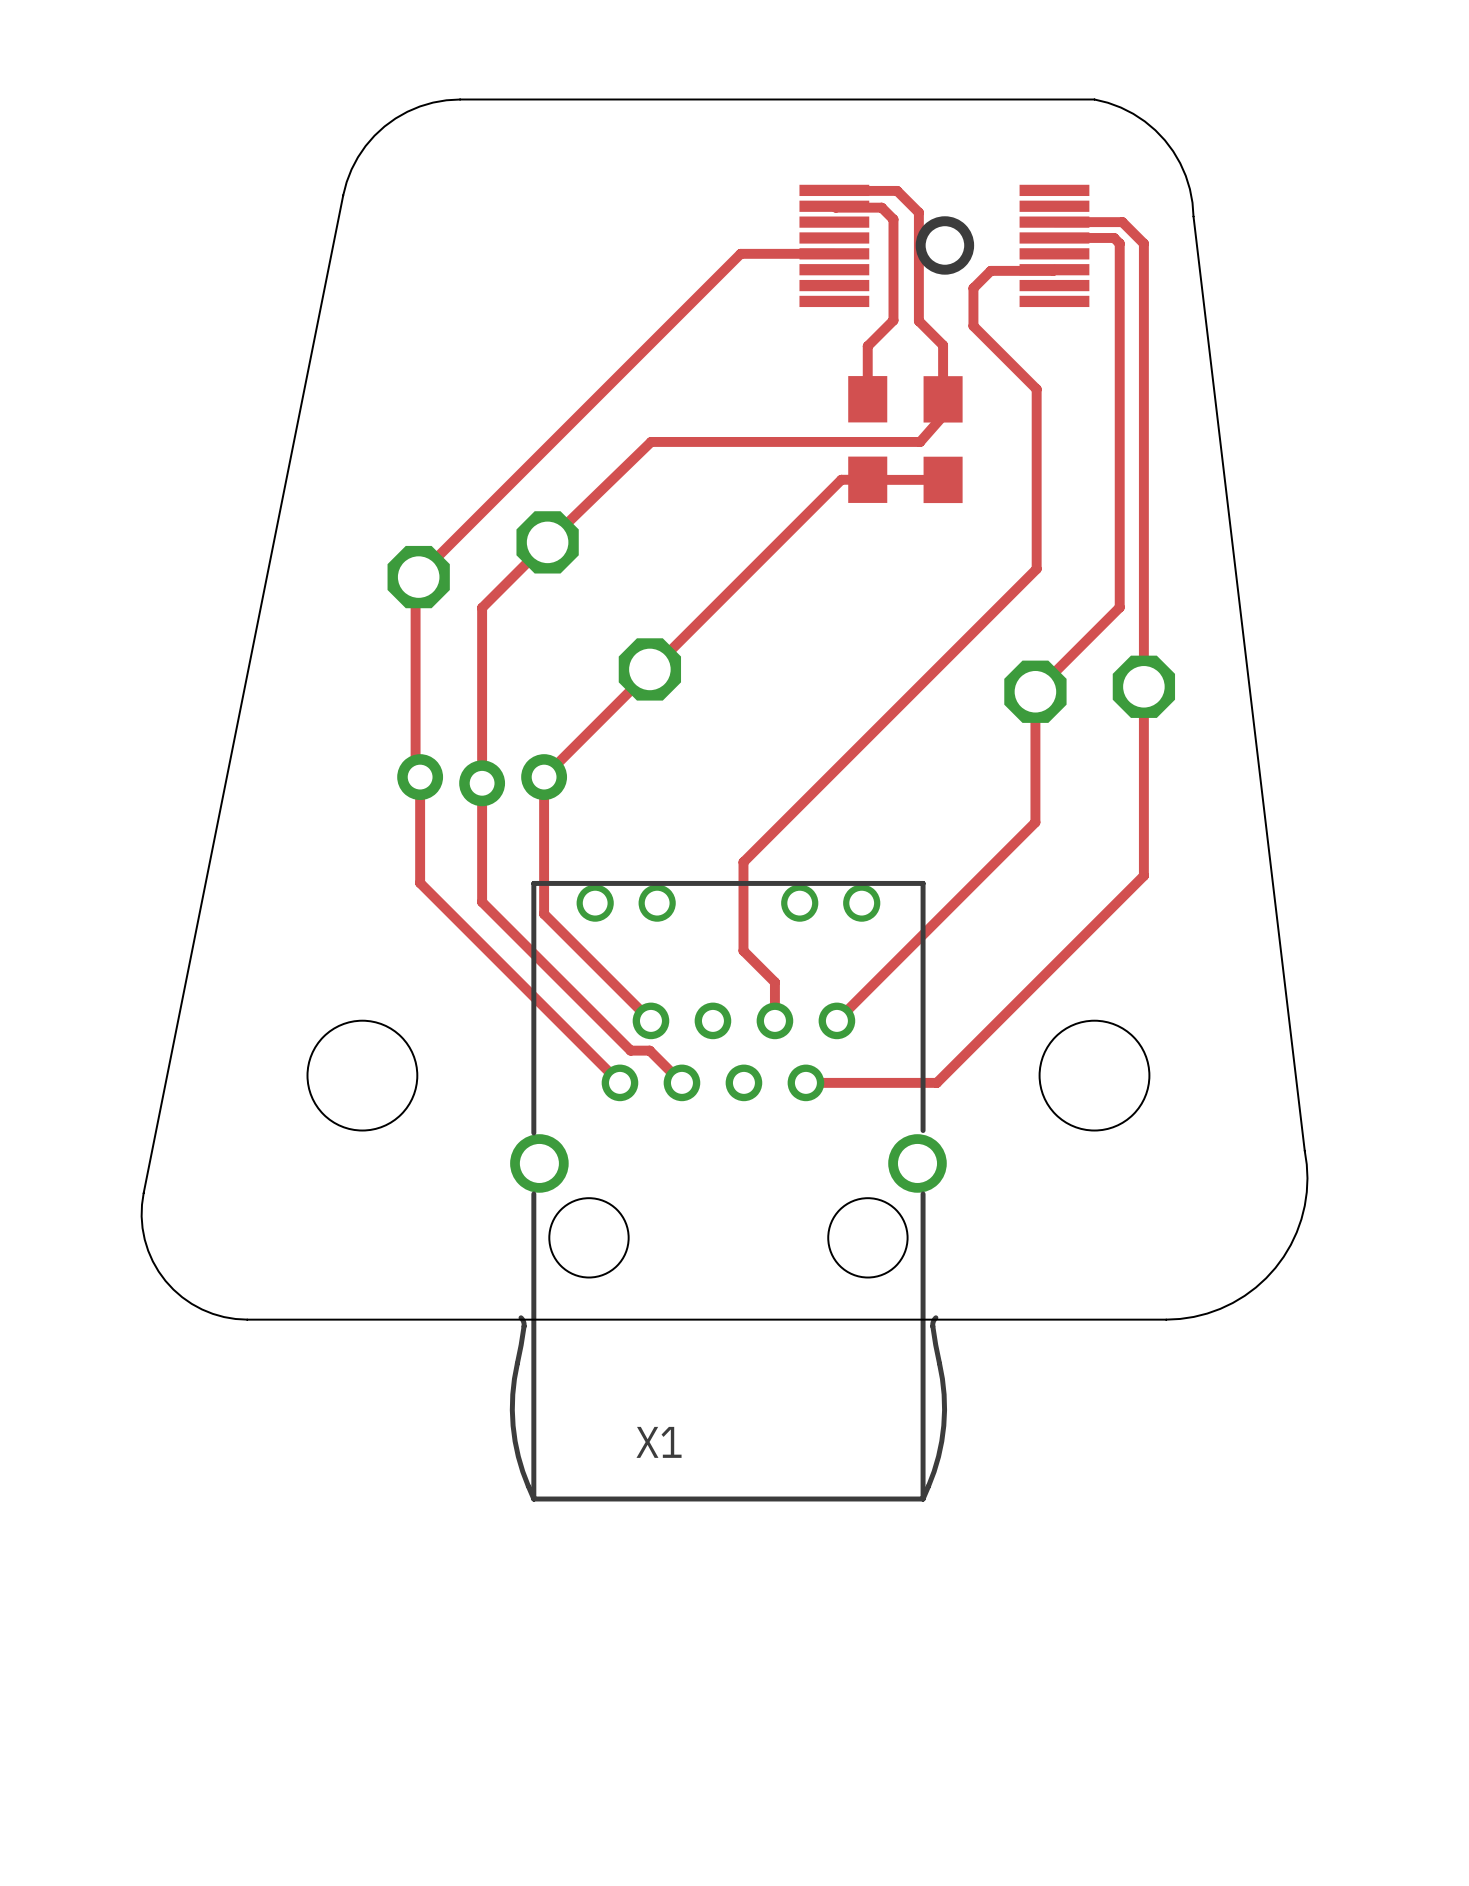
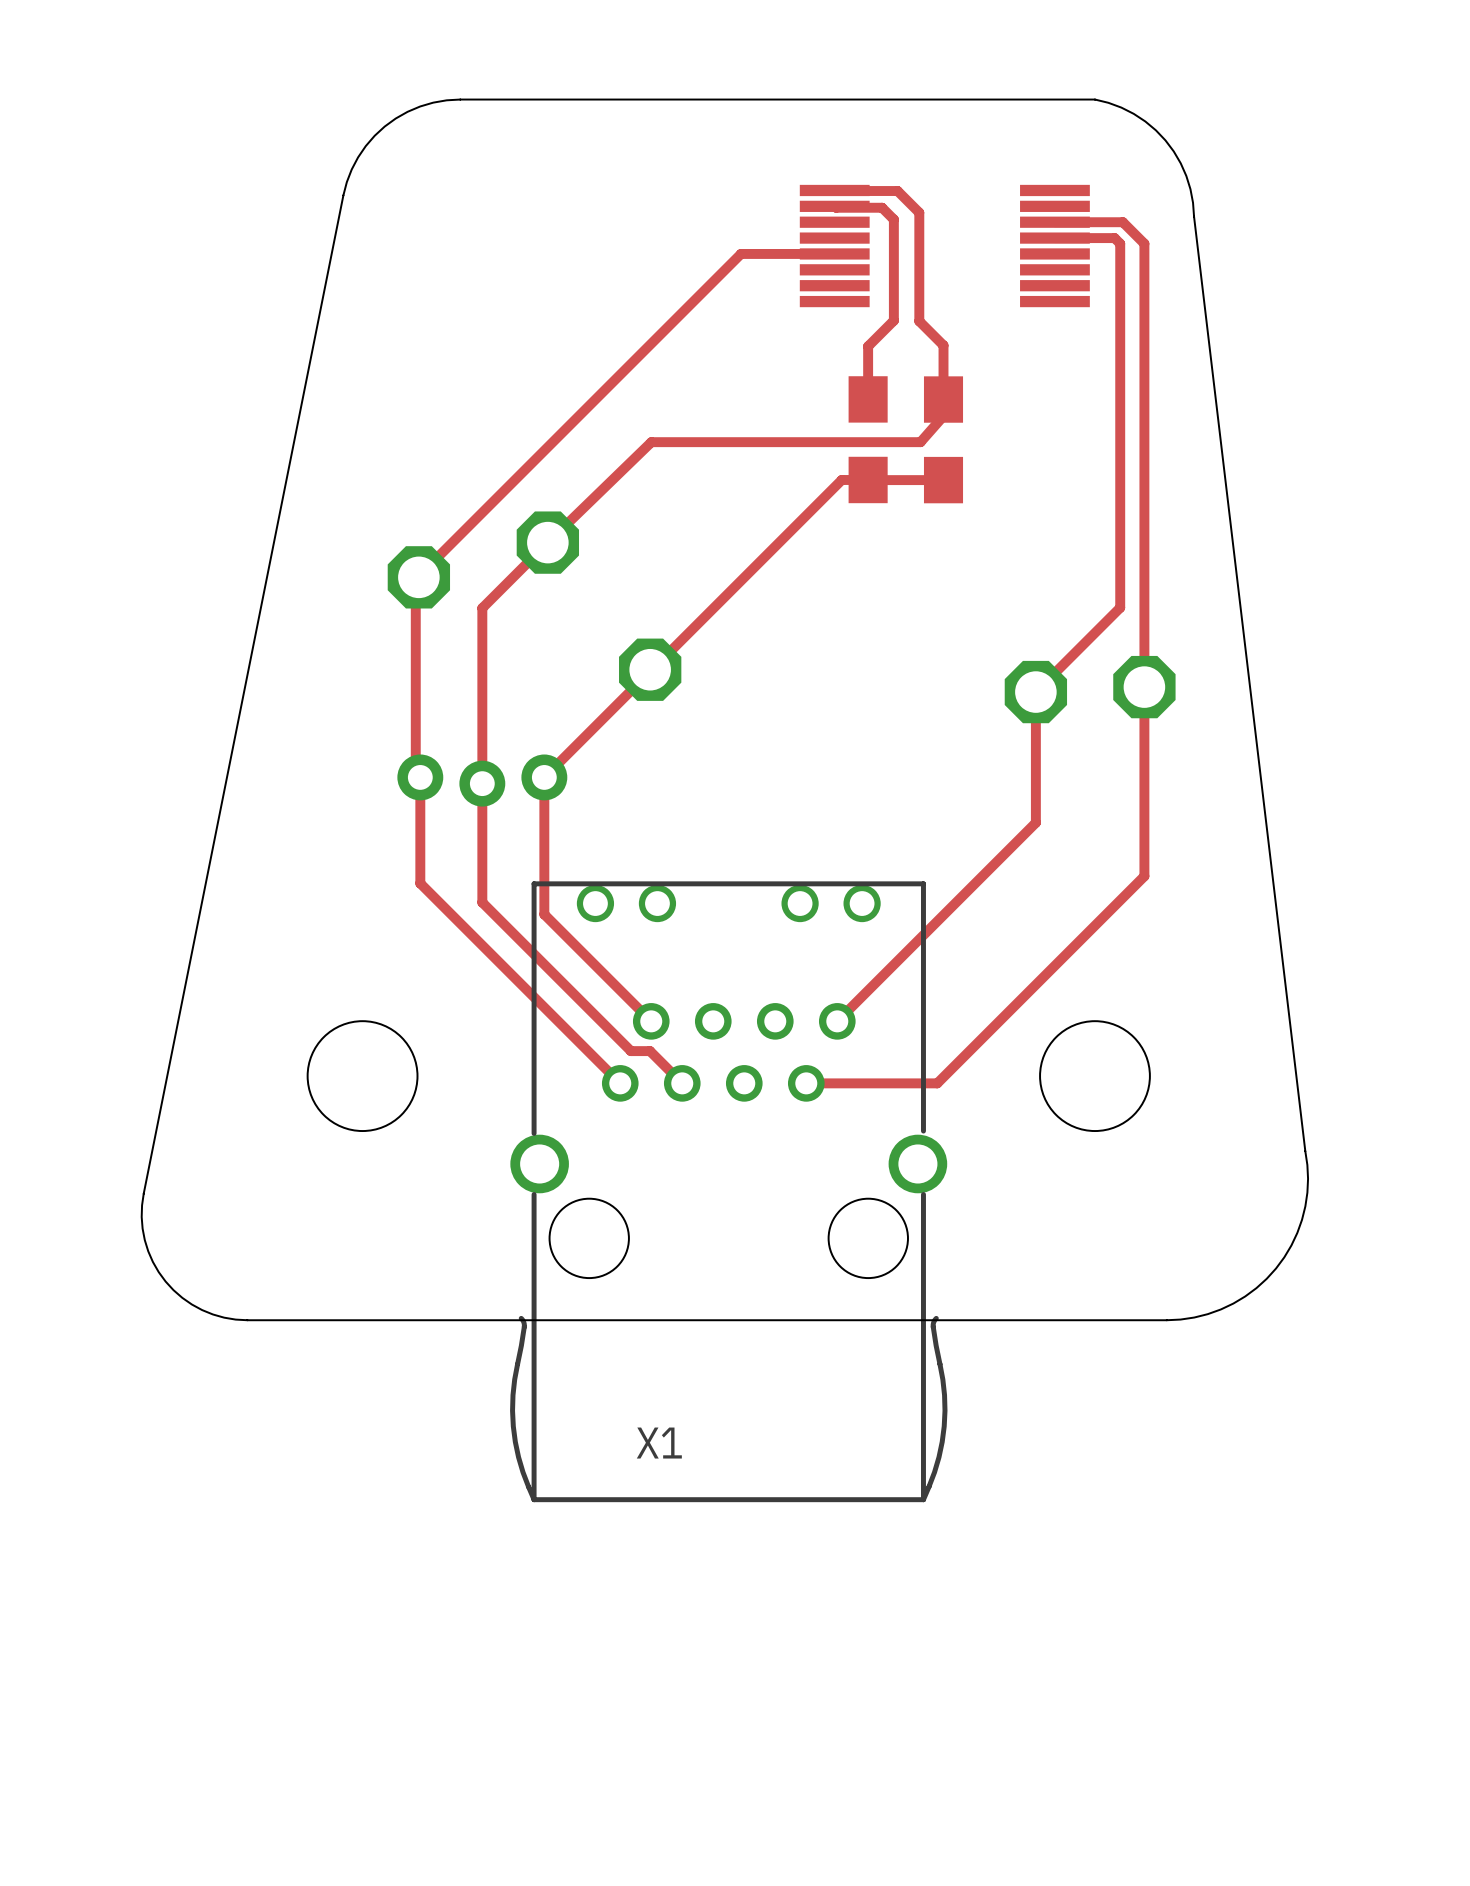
drawing: [915, 216, 975, 275] -> none
top track: (1054, 269) (990, 270) (973, 288) (973, 326) (1036, 389) (1036, 569) (743, 862) (743, 950) (774, 982) (774, 1020) -> none

